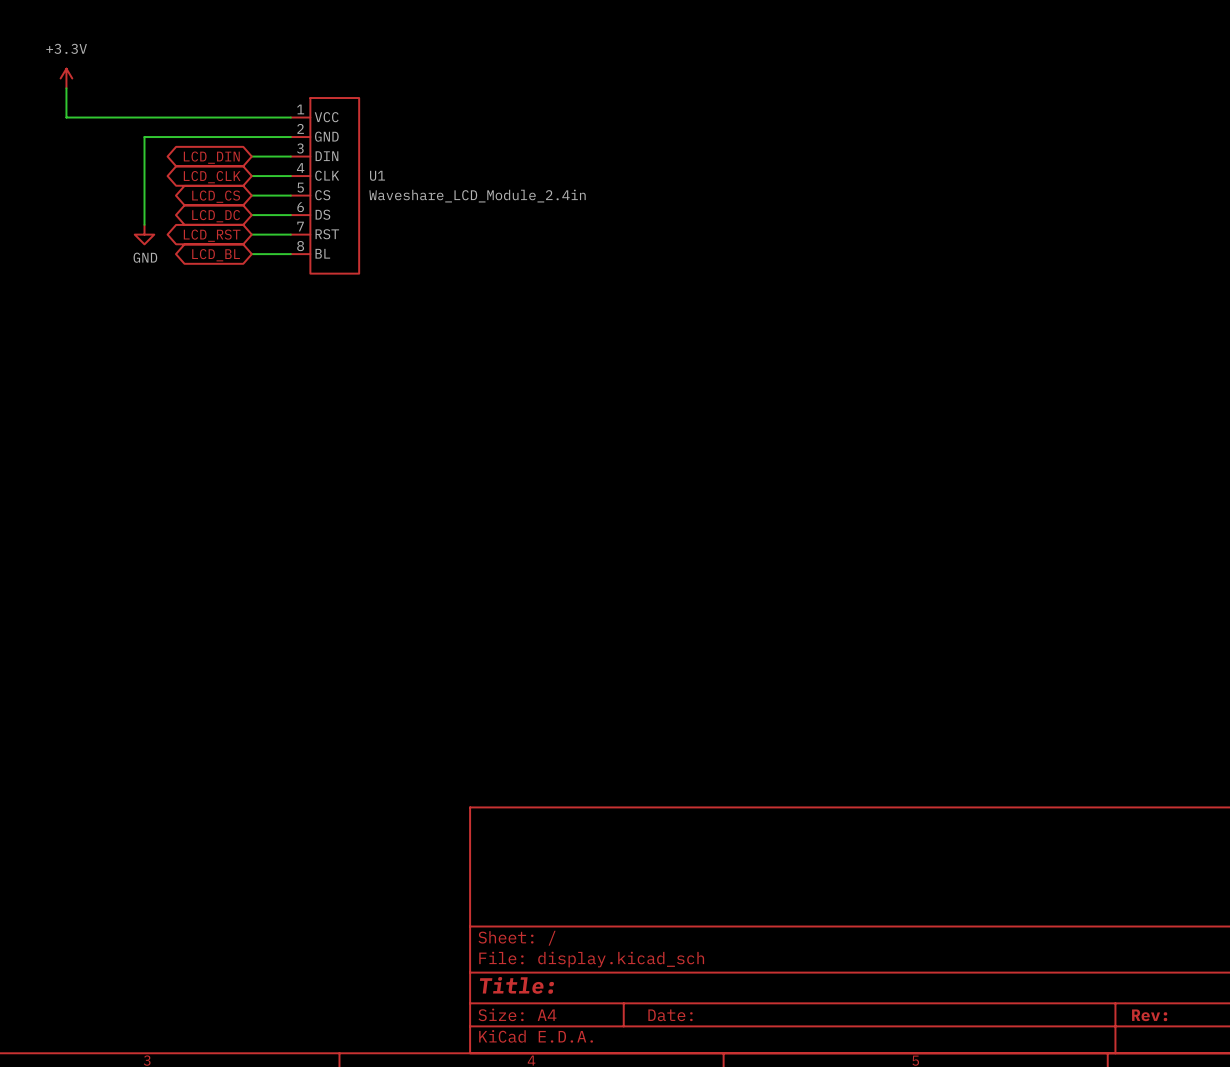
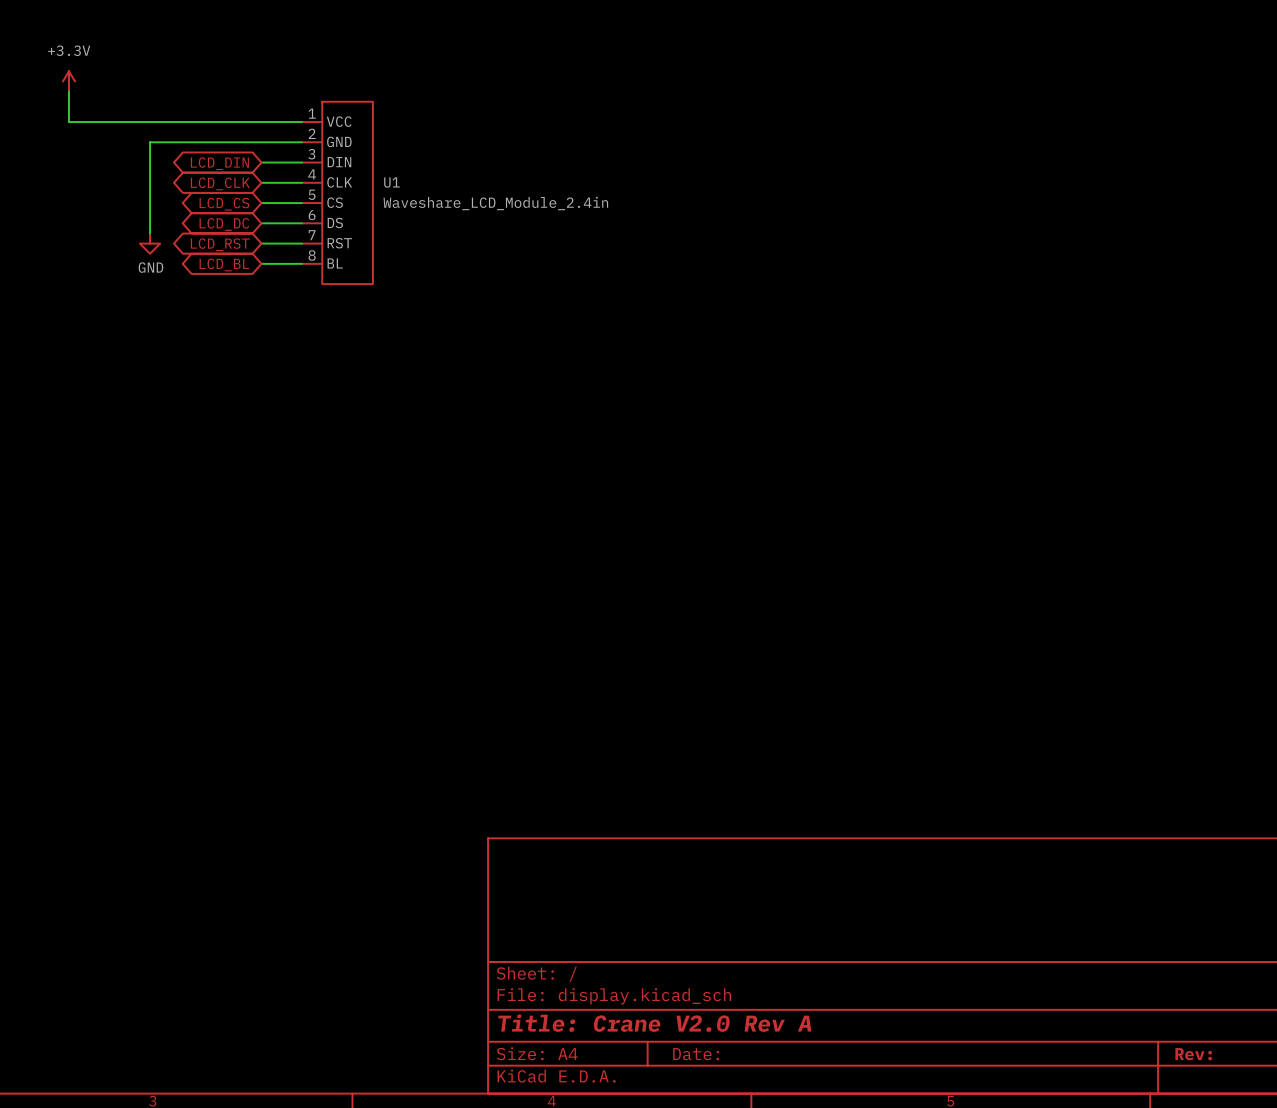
title block: Title: (516, 985) -> Title: Crane V2.0 Rev A (654, 1023)

